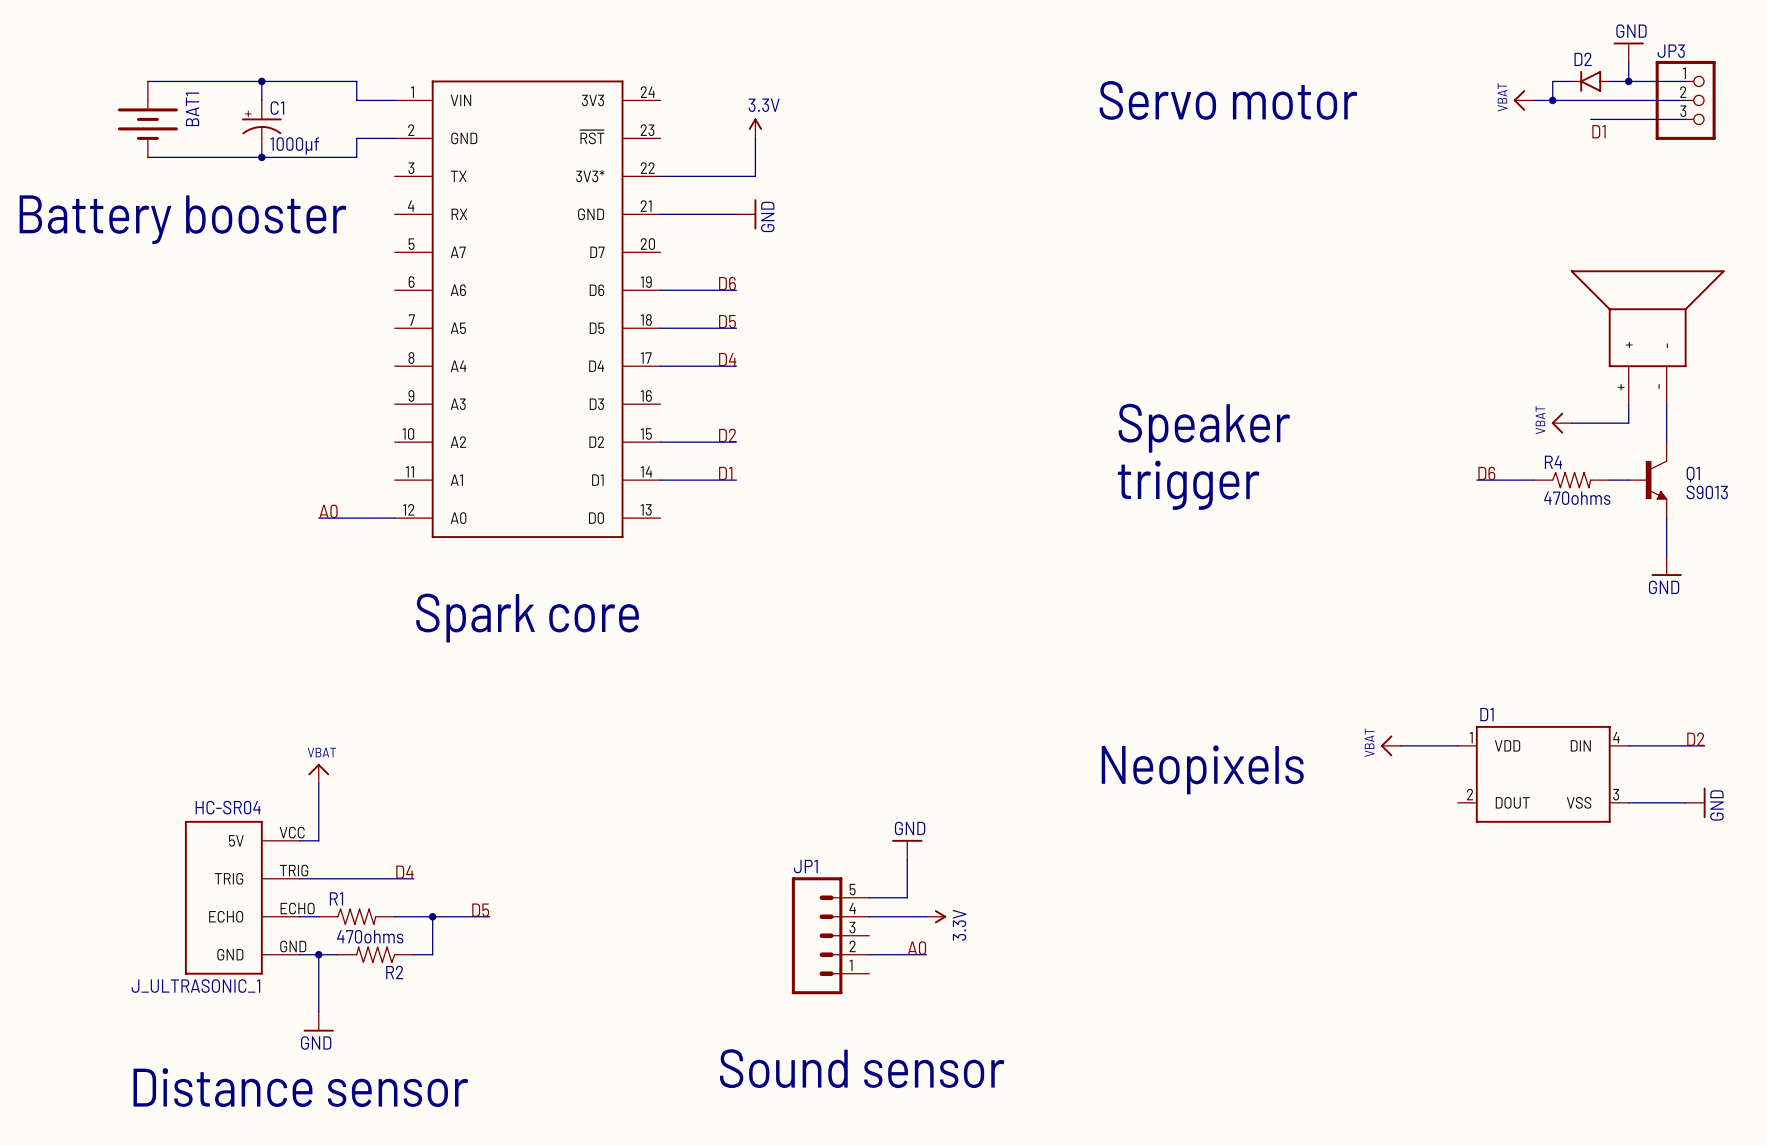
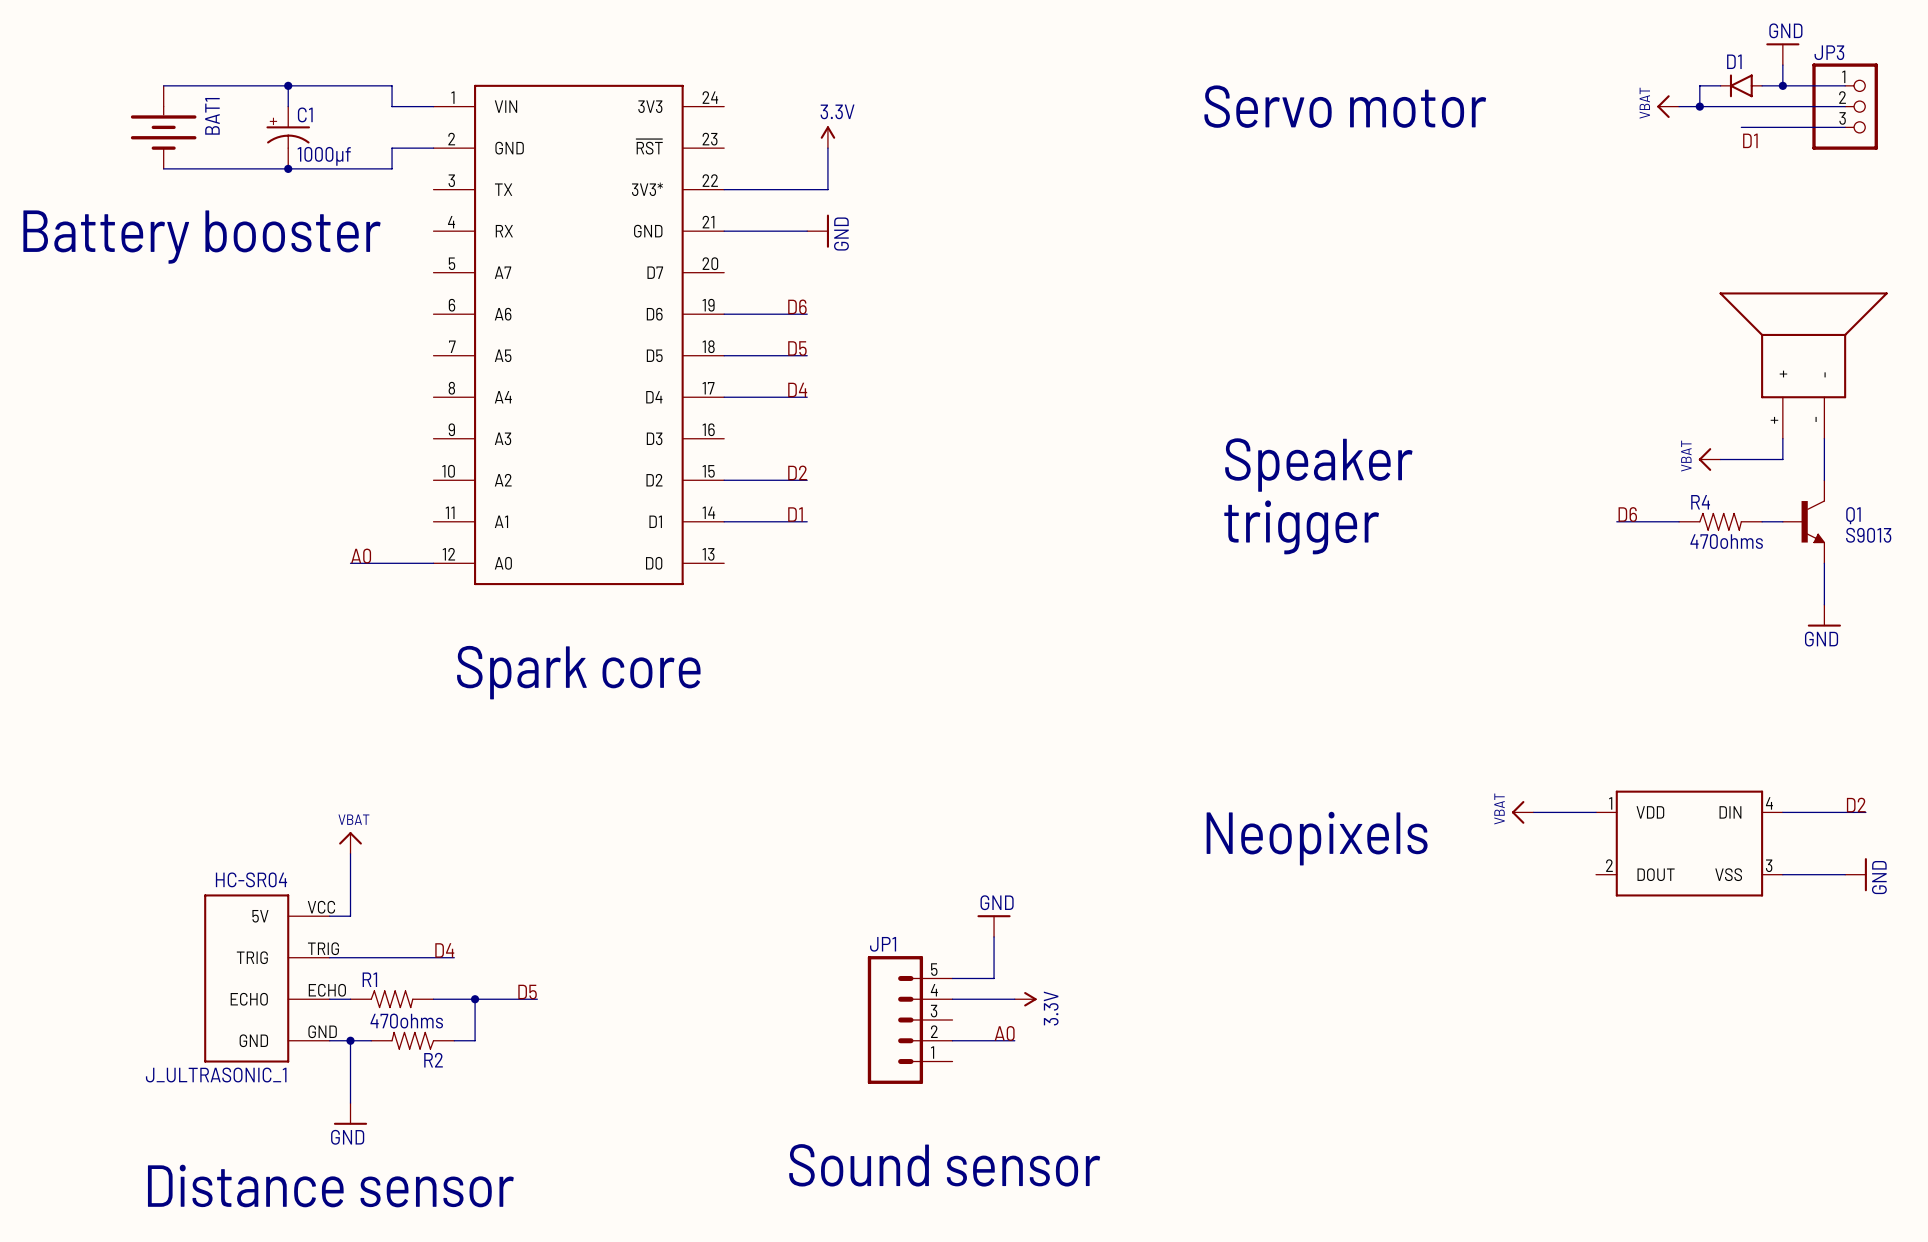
D2 name: D2 (1583, 59) -> D1 (1734, 61)
D1 name: D1 (1486, 714) -> none

